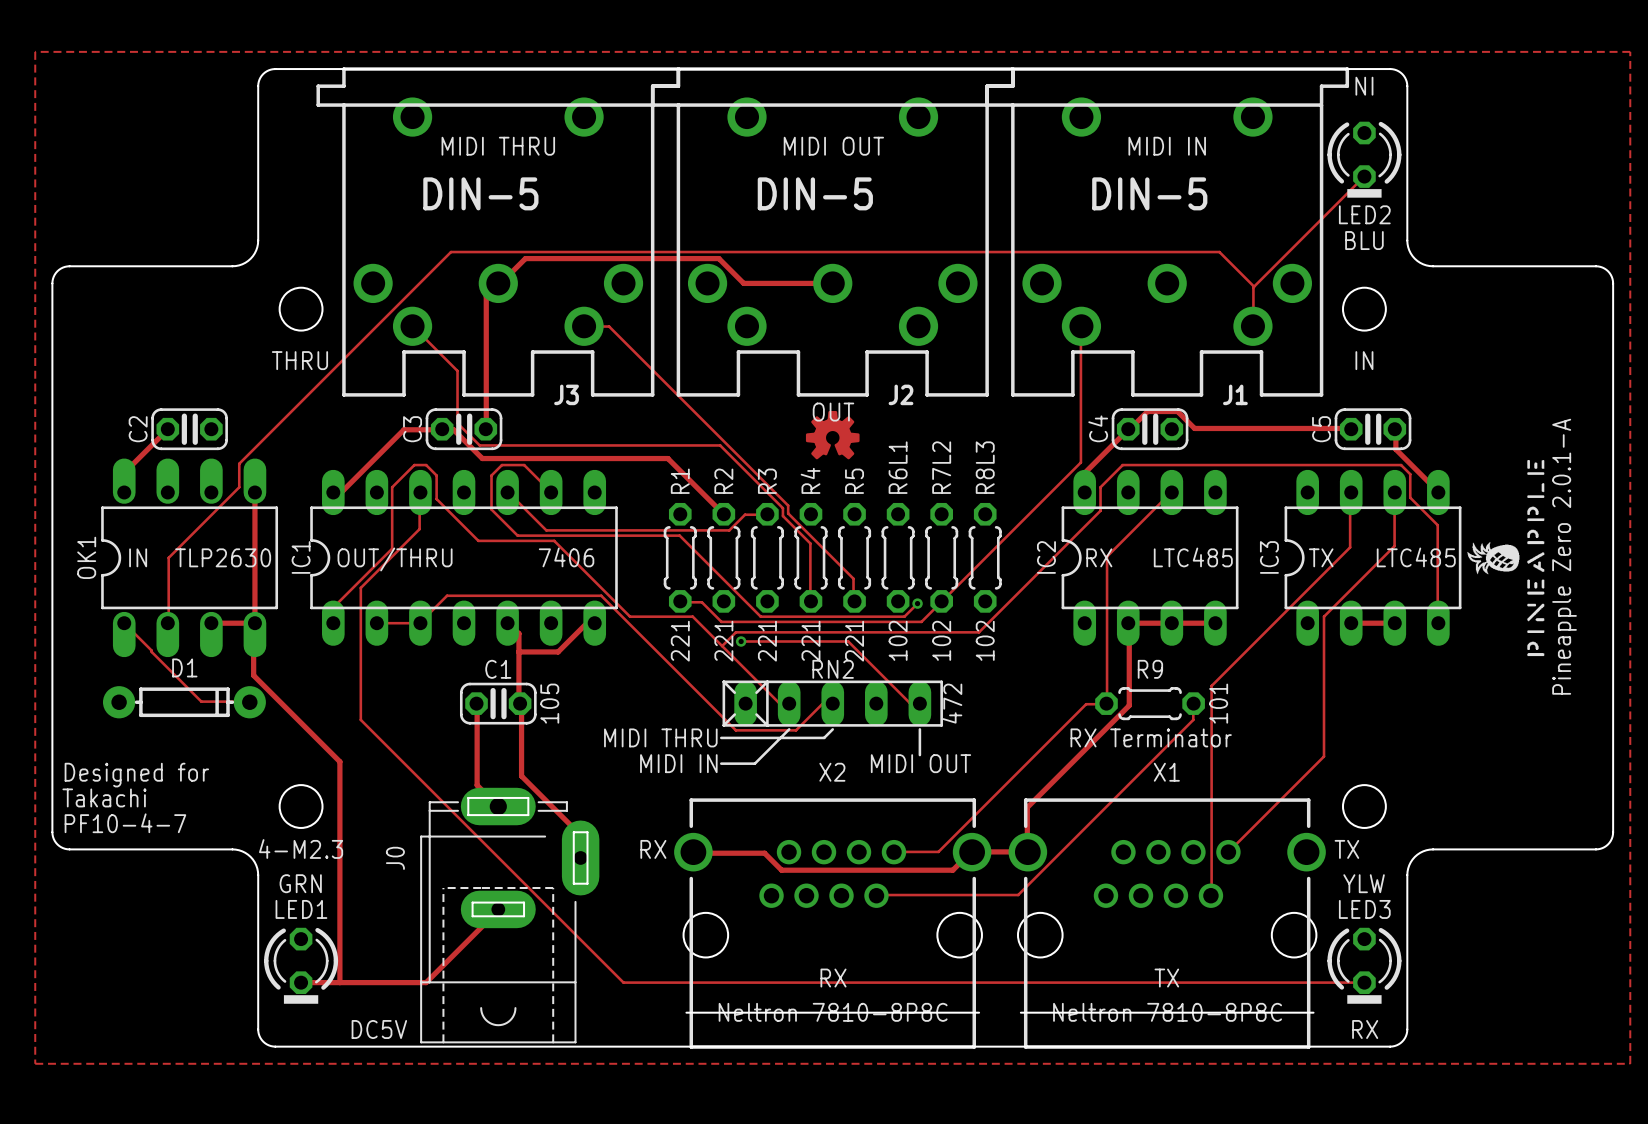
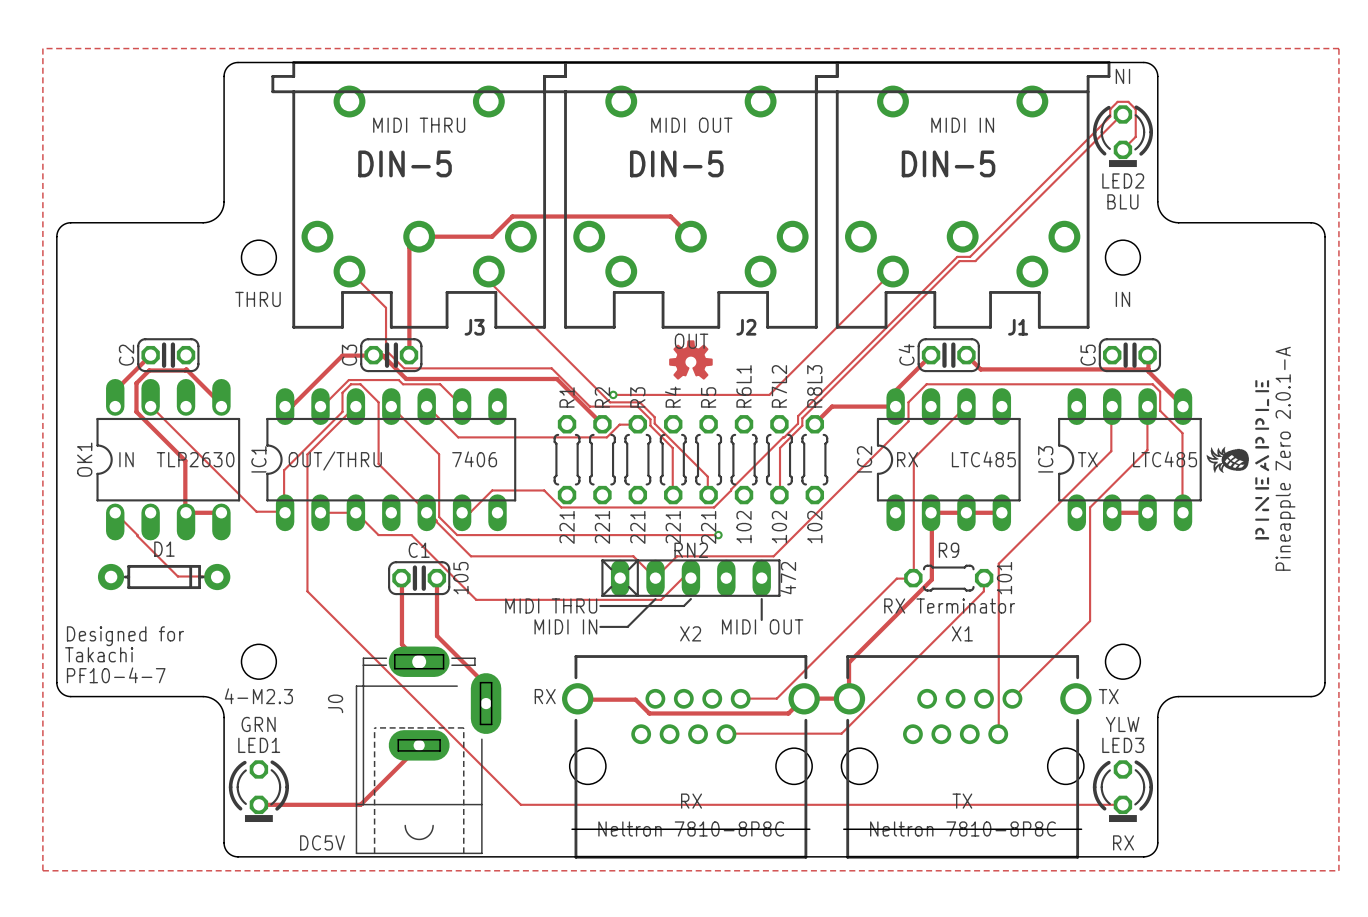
track: none -> (1122, 114) (975, 261) (959, 261) (802, 418) (802, 425) (780, 448) (780, 494)
track: (1364, 176) (1253, 287) (1252, 326) -> (1123, 149) (1135, 136) (1135, 109) (1128, 101) (1117, 101) (1110, 109) (1110, 116) (970, 256) (957, 256) (798, 416) (798, 423) (714, 507)
track: (613, 258) (525, 258) (500, 283) -> (512, 216) (492, 236) (421, 236)
track: (718, 258) (743, 283) (832, 283) -> (598, 216) (670, 216) (690, 236)
track: (1254, 286) (1219, 252) (450, 252) (239, 463) (239, 487) (168, 557) (167, 623) -> none
track: (584, 326) (609, 326) (769, 487) -> (489, 271) (489, 281) (610, 402) (639, 402)
track: (1080, 326) (1080, 462) (942, 600) -> (892, 271) (769, 394) (613, 394)
track: (1128, 429) (1147, 411) (1177, 411) (1194, 428) (1351, 429) -> none
track: none -> (966, 355) (980, 369) (1148, 369)
track: (661, 445) (720, 445) (767, 492) -> (551, 368) (589, 406) (637, 406)
track: (501, 465) (491, 475) (491, 509) (517, 535) (679, 535) (760, 616) -> (422, 384) (403, 384) (398, 380) (348, 380) (320, 406)
track: (403, 475) (392, 487) (392, 548) (333, 607) (333, 623) -> (342, 392) (342, 411) (284, 470) (285, 512) (256, 511) (150, 406)
track: (436, 475) (436, 499) (478, 540) (554, 540) (630, 616) (673, 616) -> (369, 392) (378, 402) (378, 463) (427, 512)
via: none -> (613, 394)
track: (254, 492) (253, 675) (339, 761) (339, 982) -> (221, 406) (186, 369) (149, 370) (136, 383) (136, 411) (185, 460) (186, 512)
track: (419, 492) (419, 529) (360, 587) -> (355, 406) (307, 454) (307, 484)
track: none -> (391, 406) (439, 454) (439, 517) (457, 535) (718, 535)
track: none -> (895, 406) (832, 406) (814, 424)
track: (588, 595) (447, 595) (420, 623) -> (492, 490) (470, 511) (462, 512)
track: (601, 595) (735, 730) -> (502, 490) (544, 490) (561, 507)
track: (680, 601) (701, 602) (721, 621) (921, 621) (941, 601) -> none
track: (917, 603) (904, 616) (861, 616) -> none
via: (917, 603) -> none
track: (692, 616) (779, 702) (788, 702) -> (577, 507) (632, 507)
track: none -> (355, 512) (378, 535) (411, 535) (476, 599) (612, 599)
track: (594, 623) (586, 623) (558, 651) (518, 651) -> none
track: (978, 632) (735, 632) (722, 646) -> (809, 520) (773, 556) (677, 556) (655, 578)
track: (518, 633) (521, 776) -> (436, 578) (438, 637)
track: none -> (435, 521) (470, 556) (633, 556) (654, 577)
track: (741, 641) (848, 641) (909, 702) (919, 703) -> none
via: (741, 641) -> none
via: none -> (718, 535)

